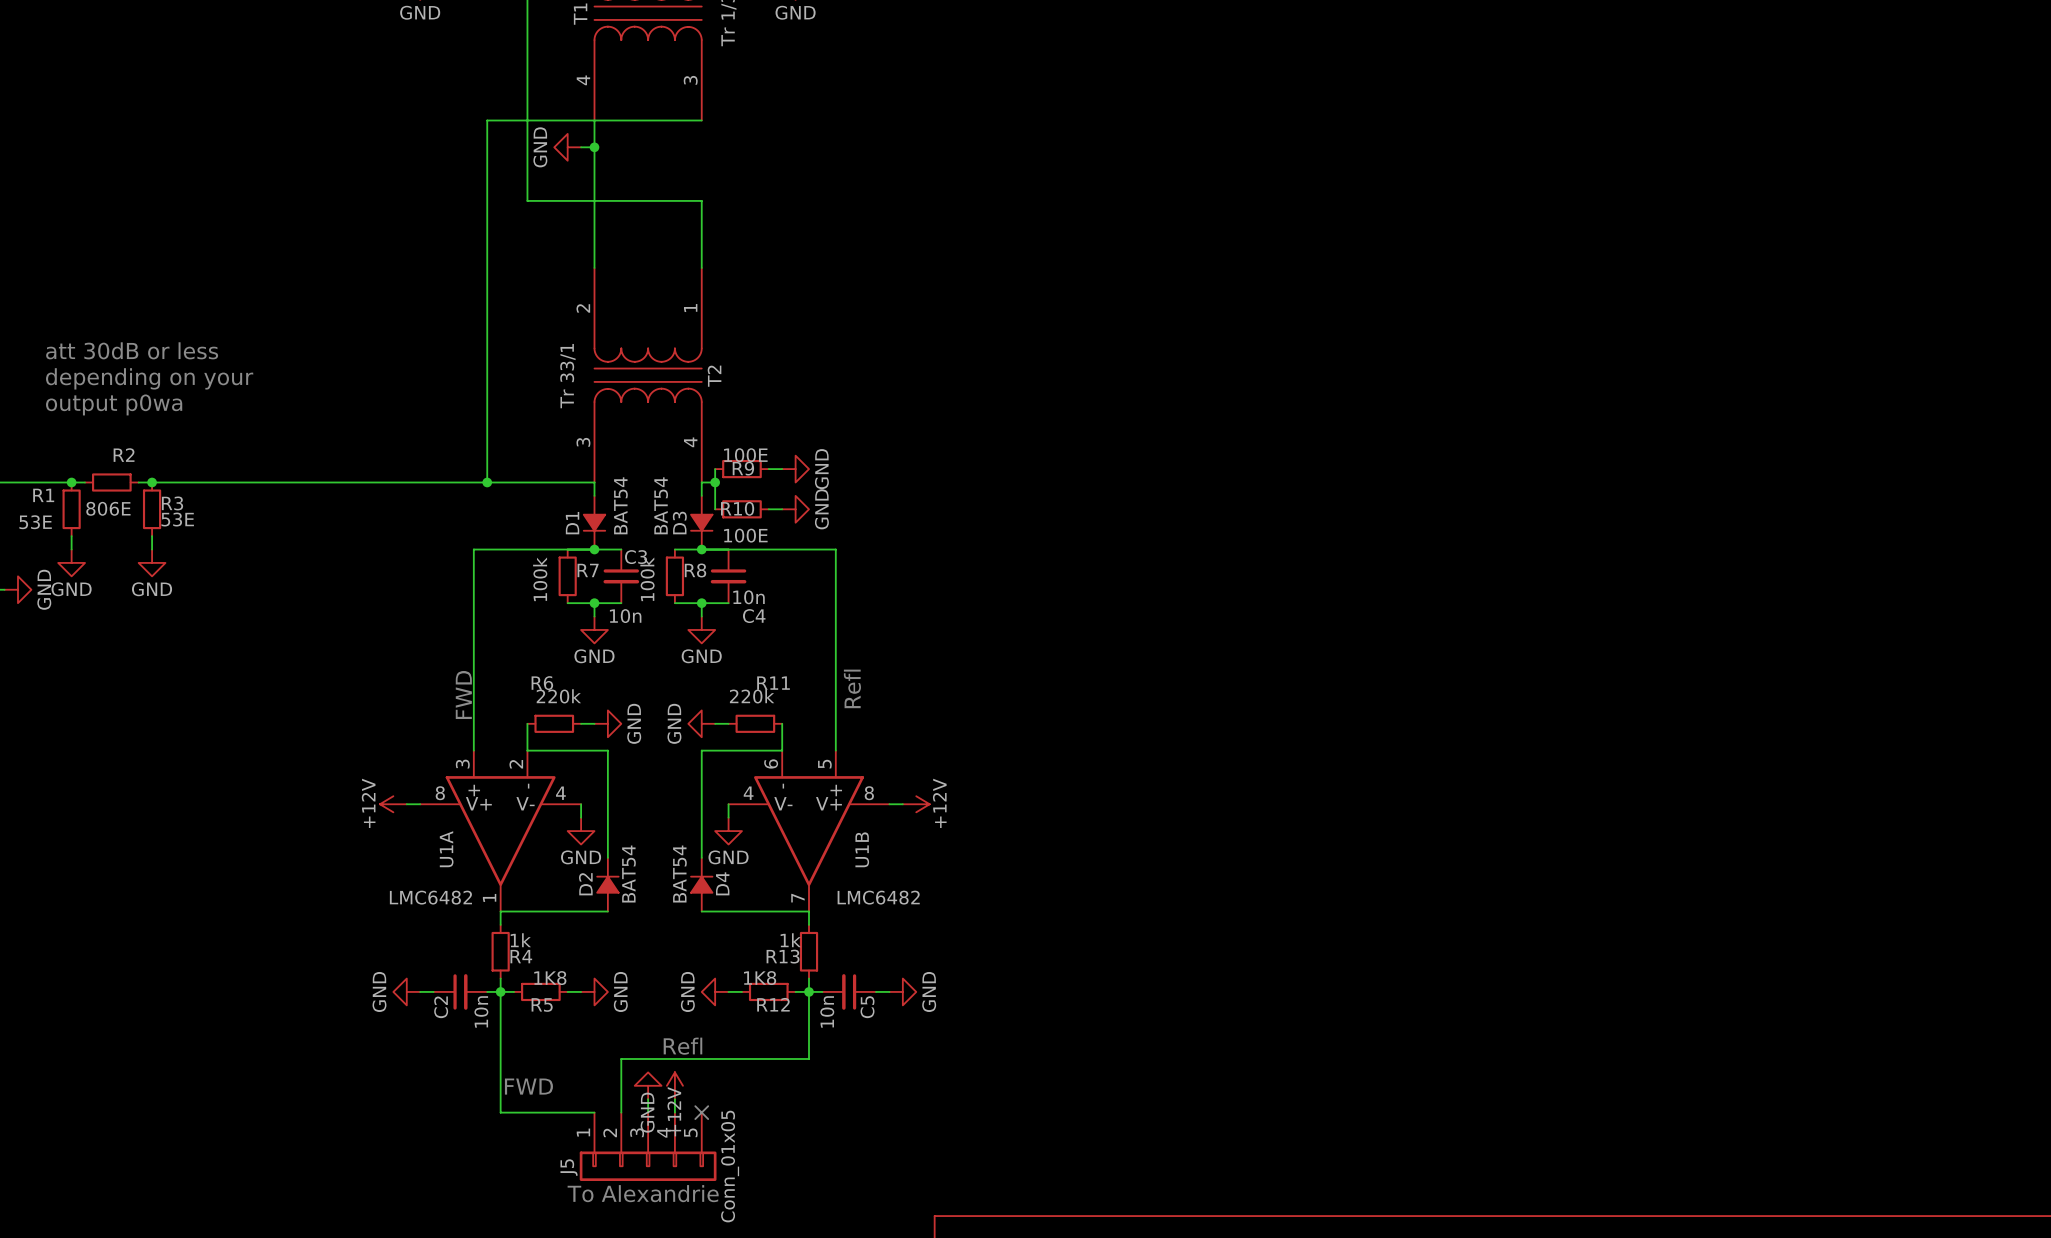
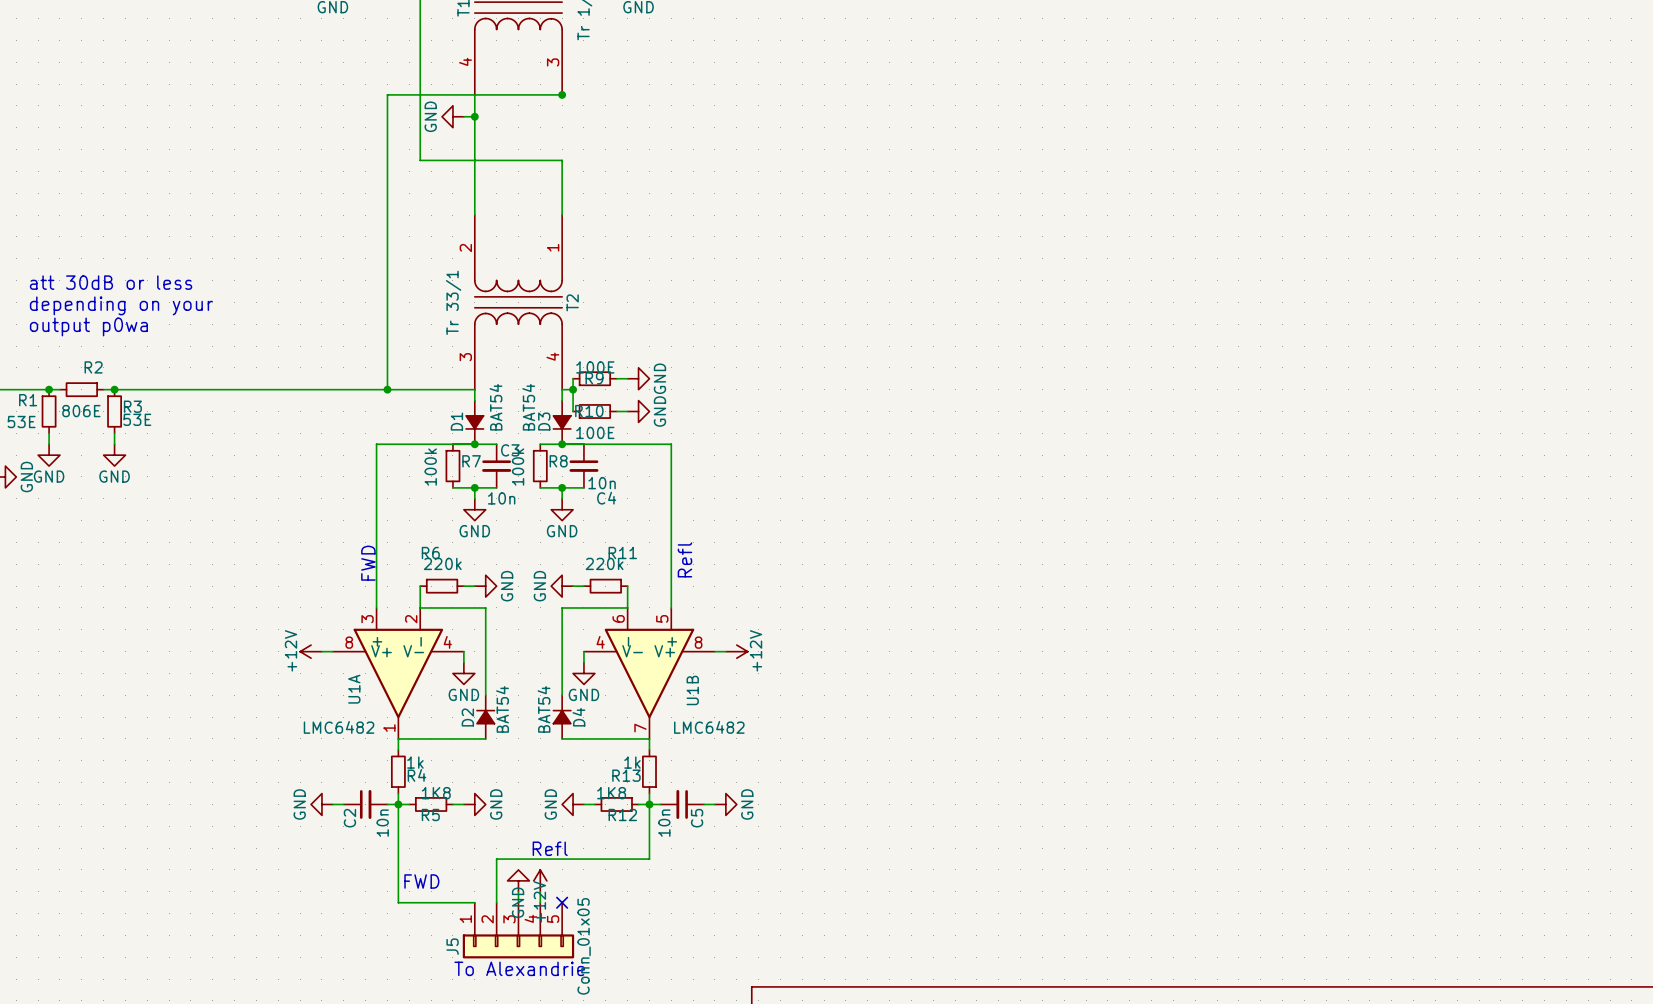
junction: none -> (562, 94)

